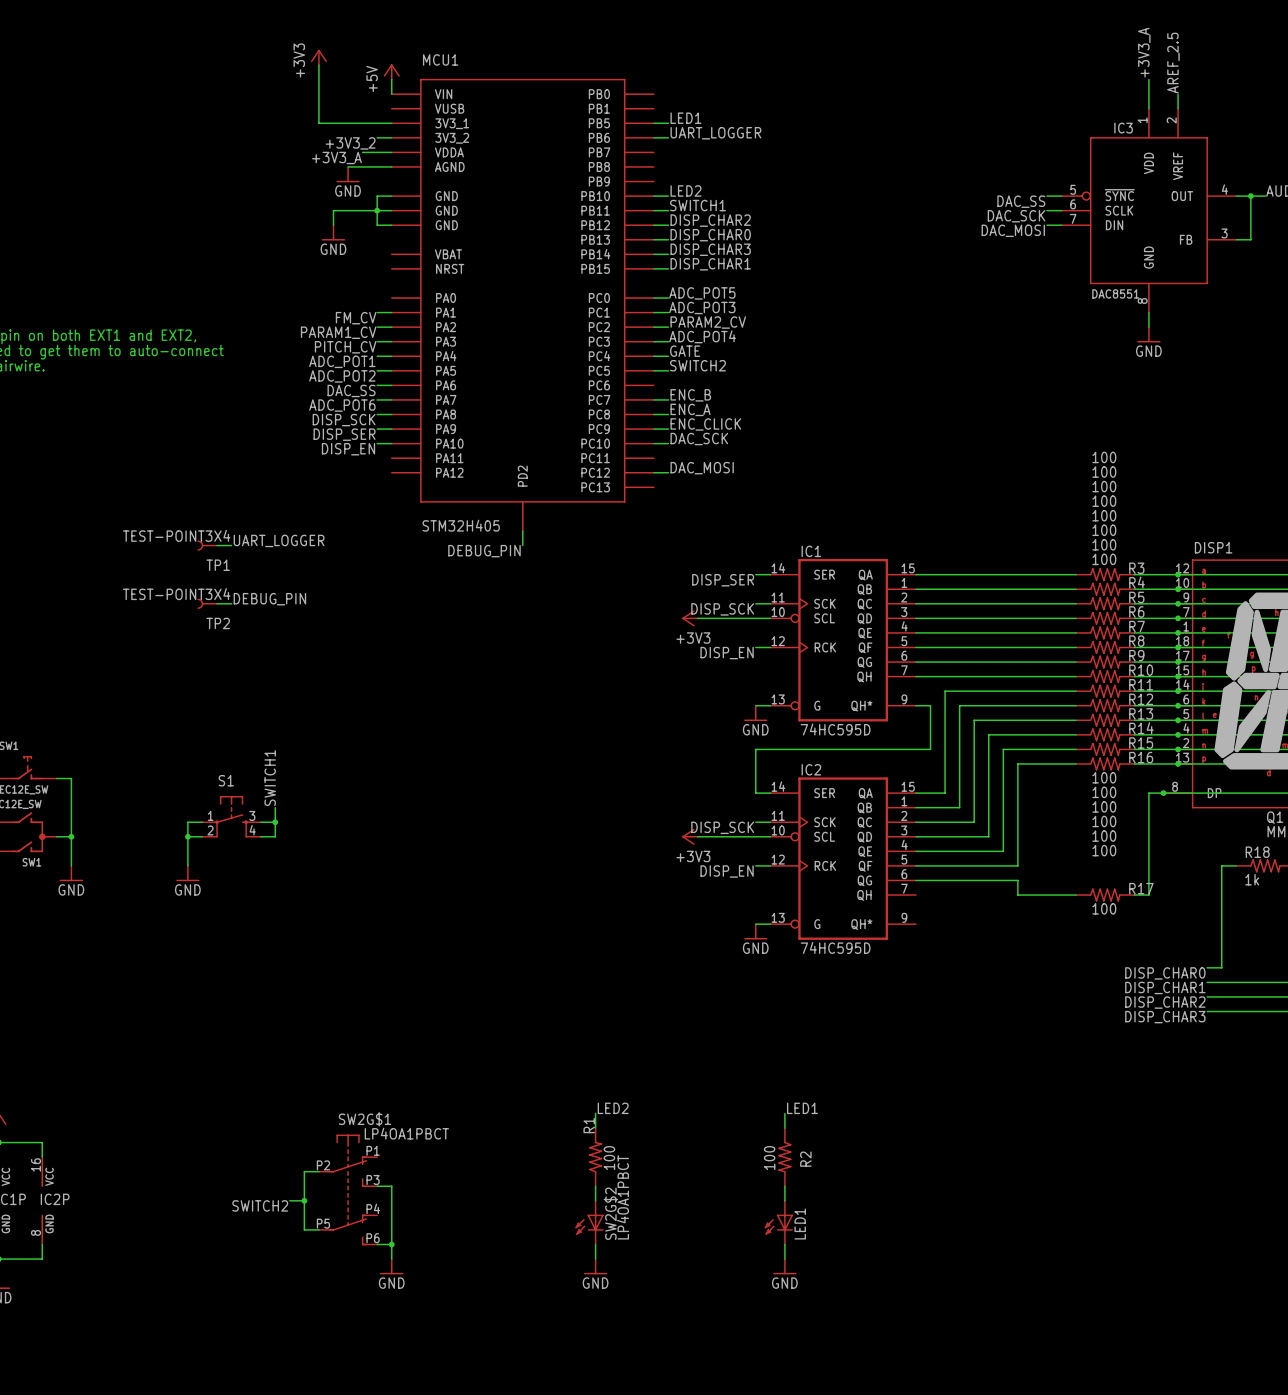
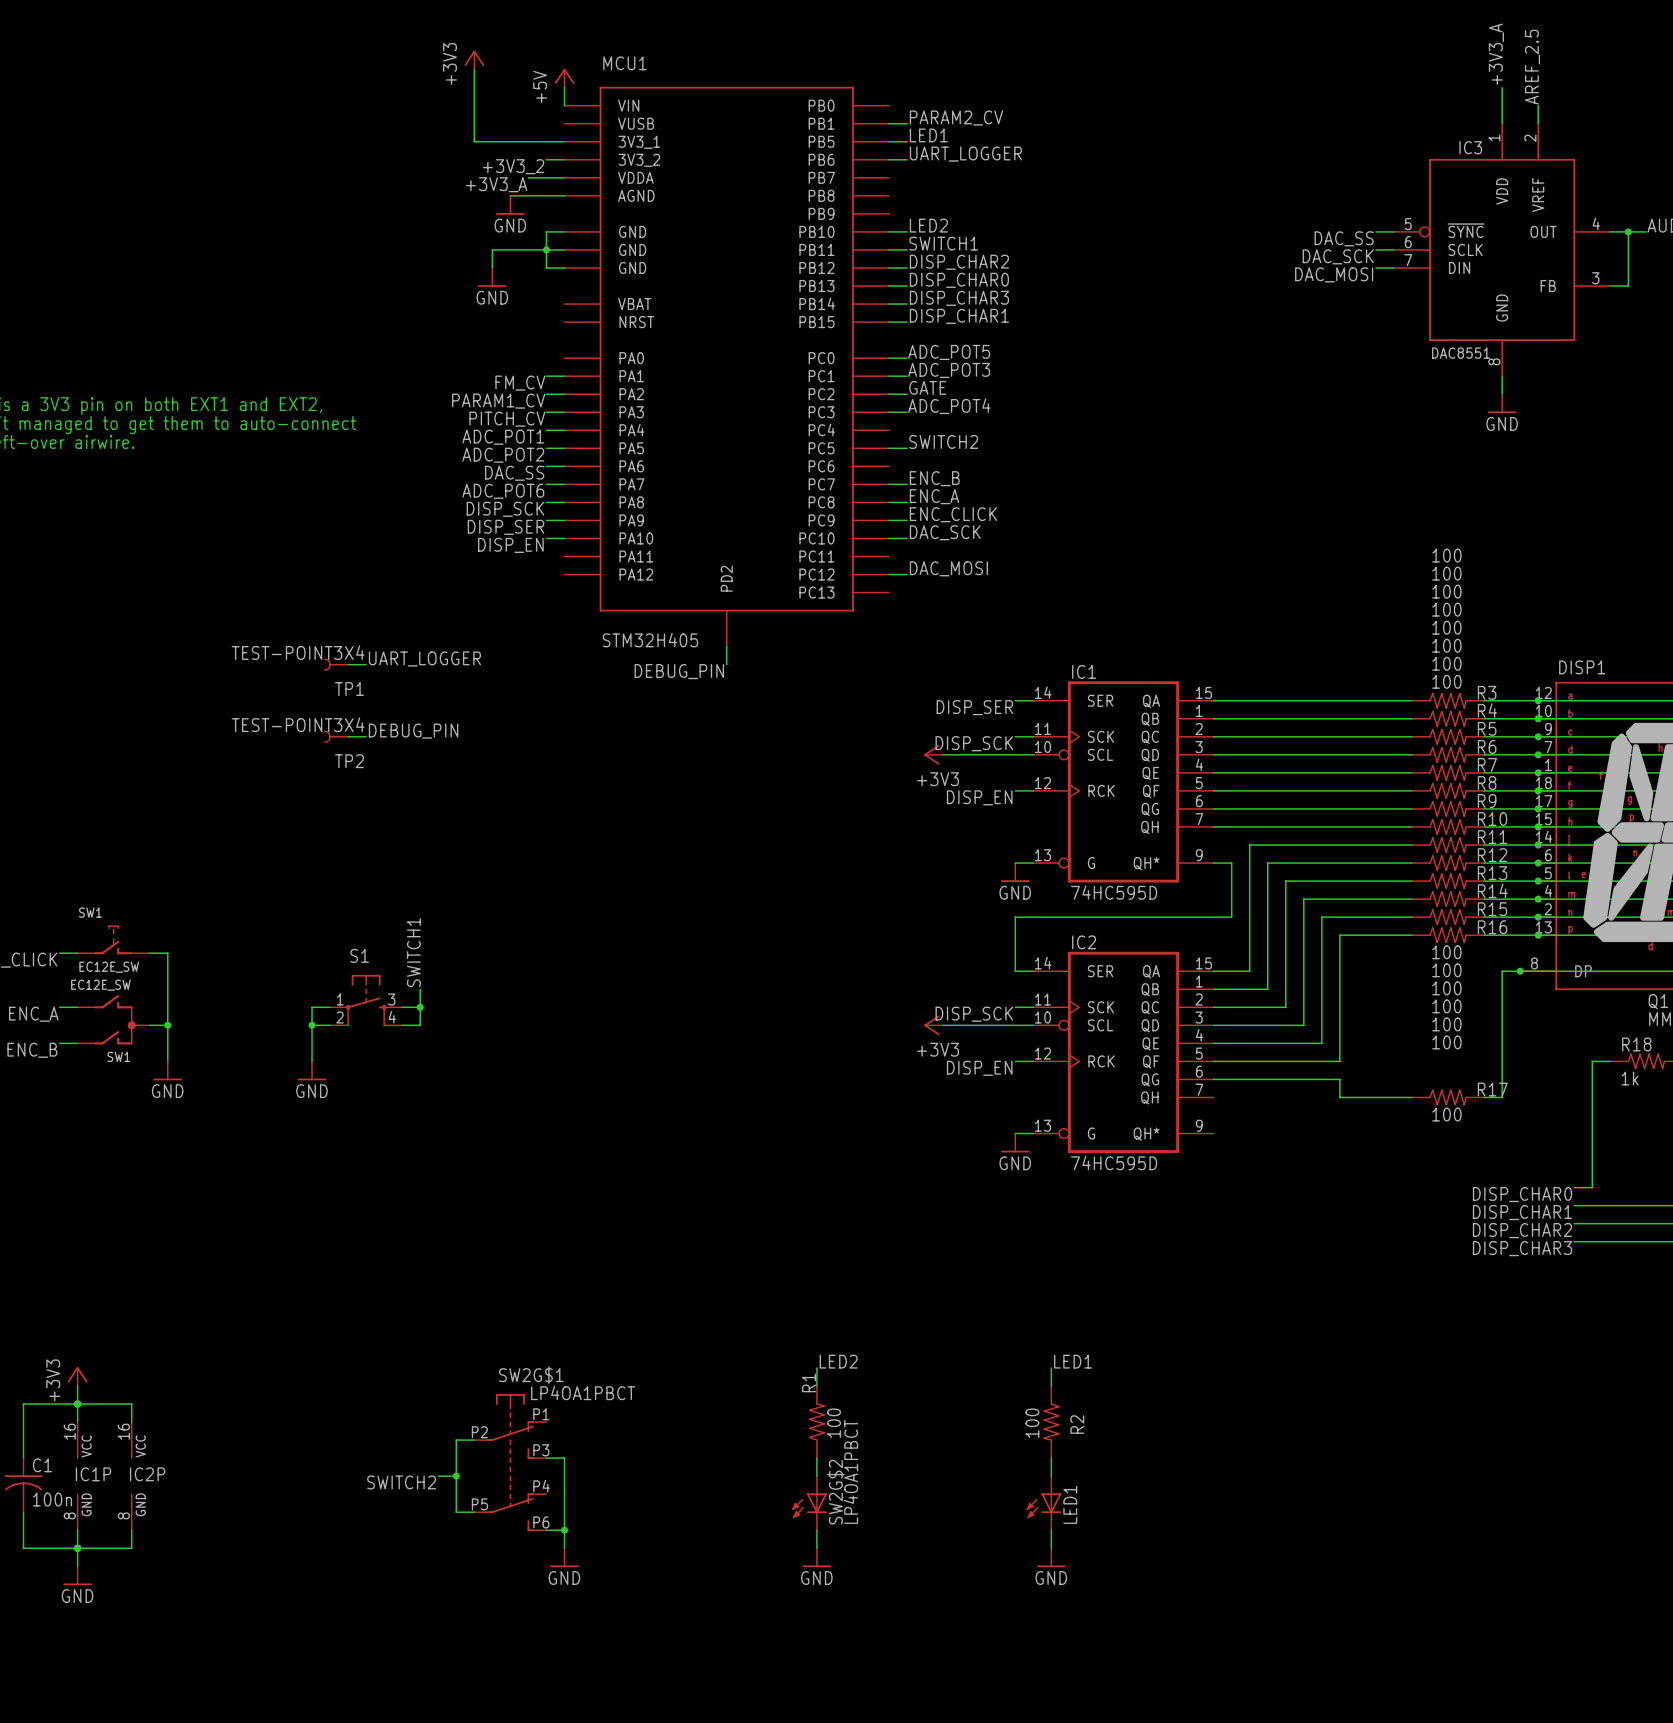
label: none -> PARAM2_CV (956, 118)
wire: none -> (889, 123) (907, 123)
label: PARAM2_CV (708, 322) -> GATE (927, 387)
label: GATE (685, 351) -> none
wire: (653, 356) (668, 356) -> none

